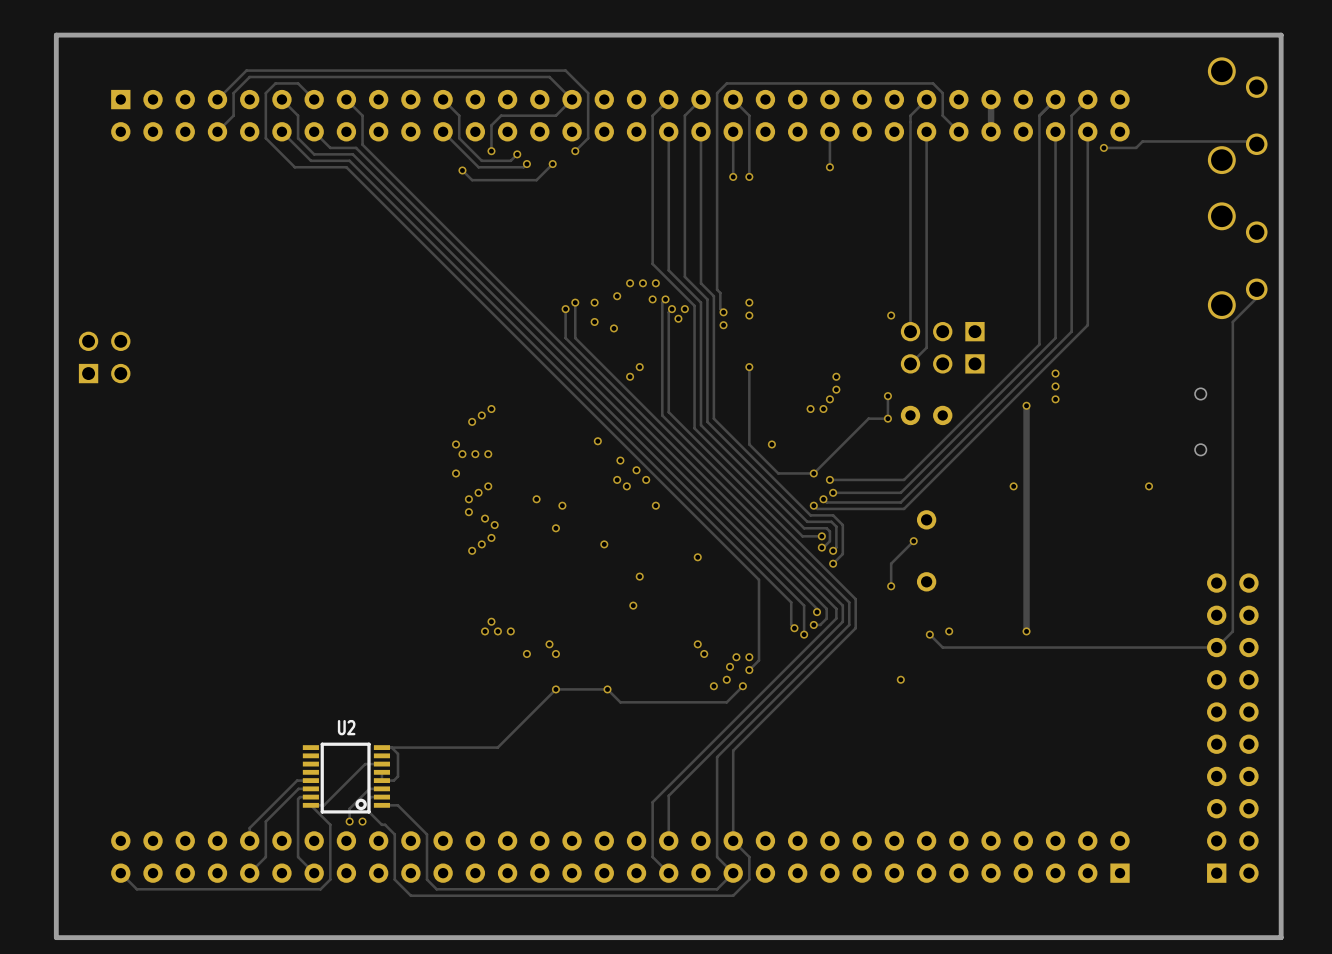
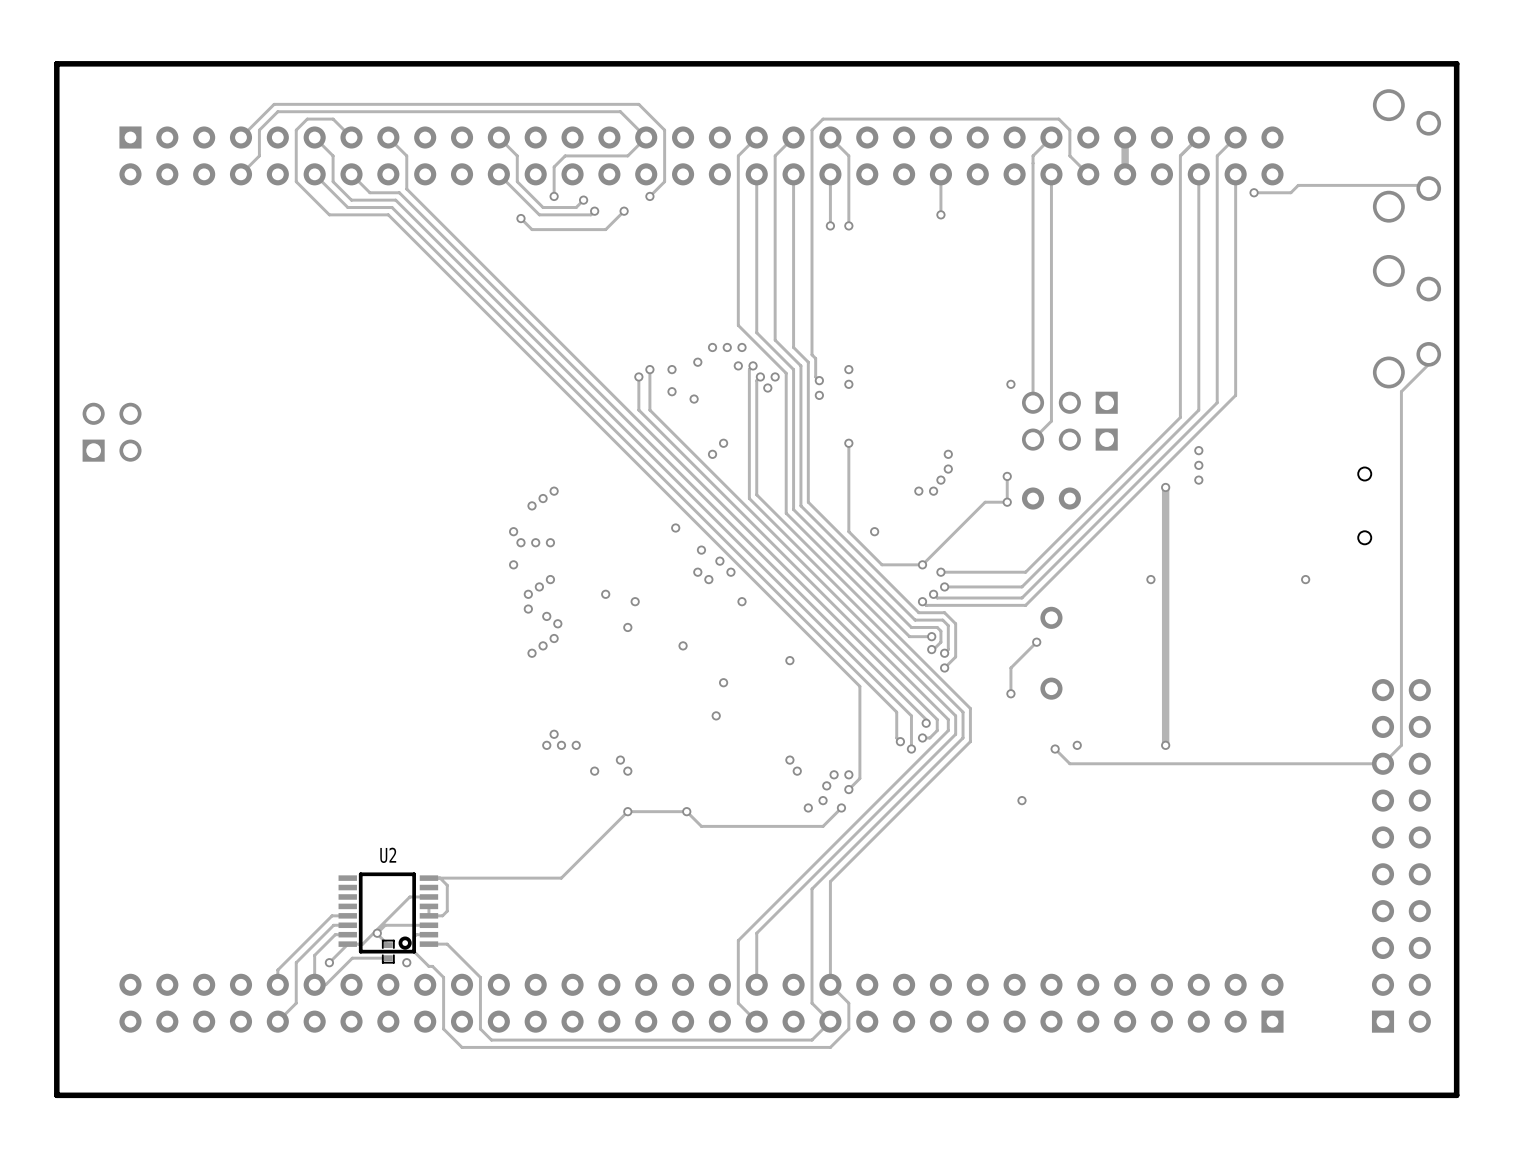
track: (369, 788) (349, 808) (349, 821) -> (414, 925) (385, 925) (377, 934) (388, 945)
via: none -> (377, 933)
track: (298, 799) (298, 857) (314, 873) -> (333, 936) (314, 955) (314, 984) (325, 984) (352, 958) (388, 958)
track: (310, 805) (330, 824) (330, 879) (320, 889) (136, 889) (120, 873) -> (347, 944) (329, 962)
part: none -> (388, 951)
via: none -> (329, 962)
via: (349, 821) -> none

